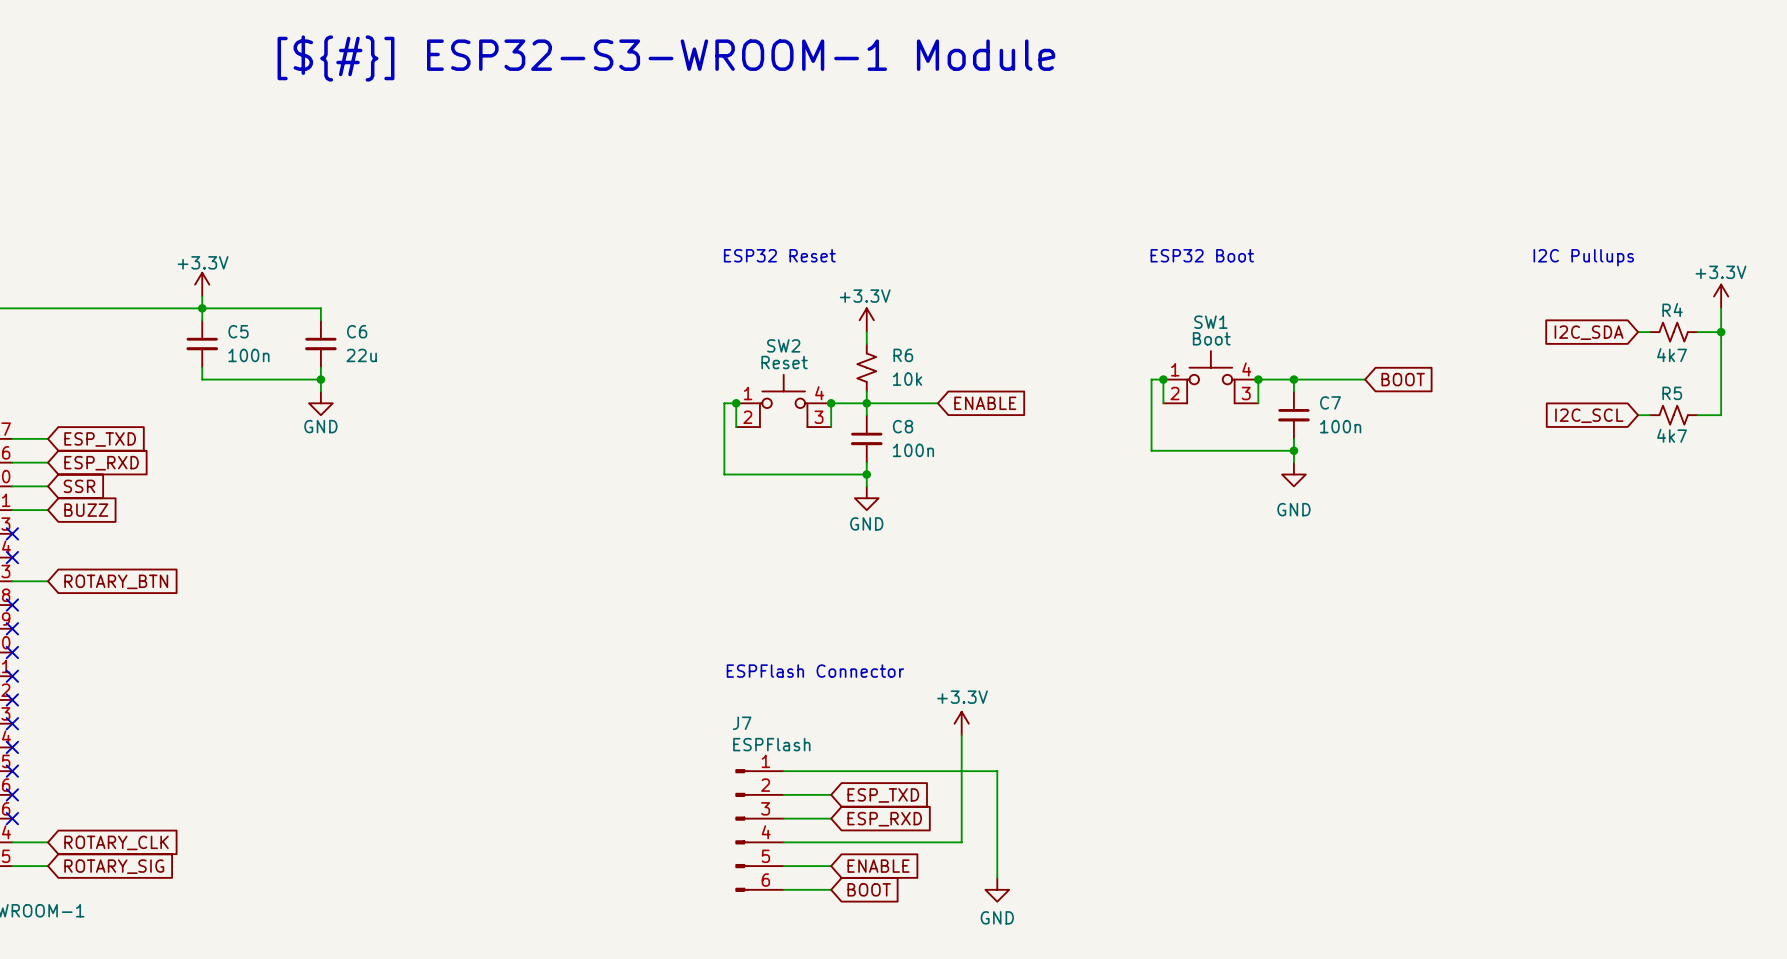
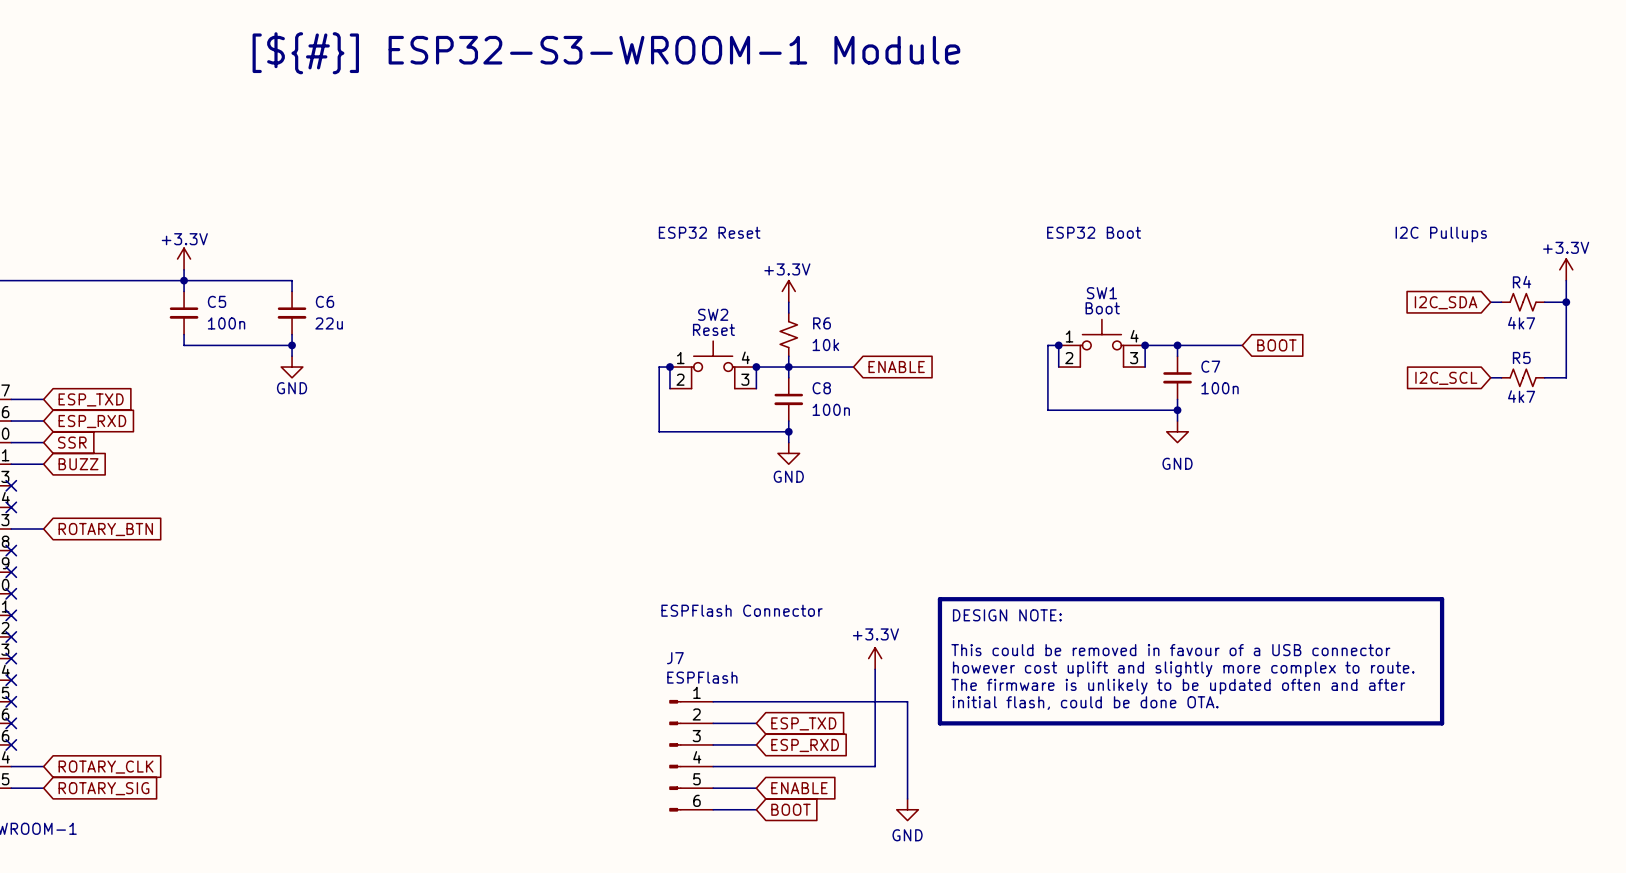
line: none -> (939, 599) (1442, 599) (1442, 723) (939, 723) (939, 599)
text: none -> DESIGN NOTE: (1007, 615)
text: none -> This could be removed in favour of a USB connector (1170, 650)
text: none -> however cost uplift and slightly more complex to route. (1183, 669)
text: none -> The firmware is unlikely to be updated often and after (1178, 686)
text: none -> initial flash, could be done OTA. (1085, 703)

